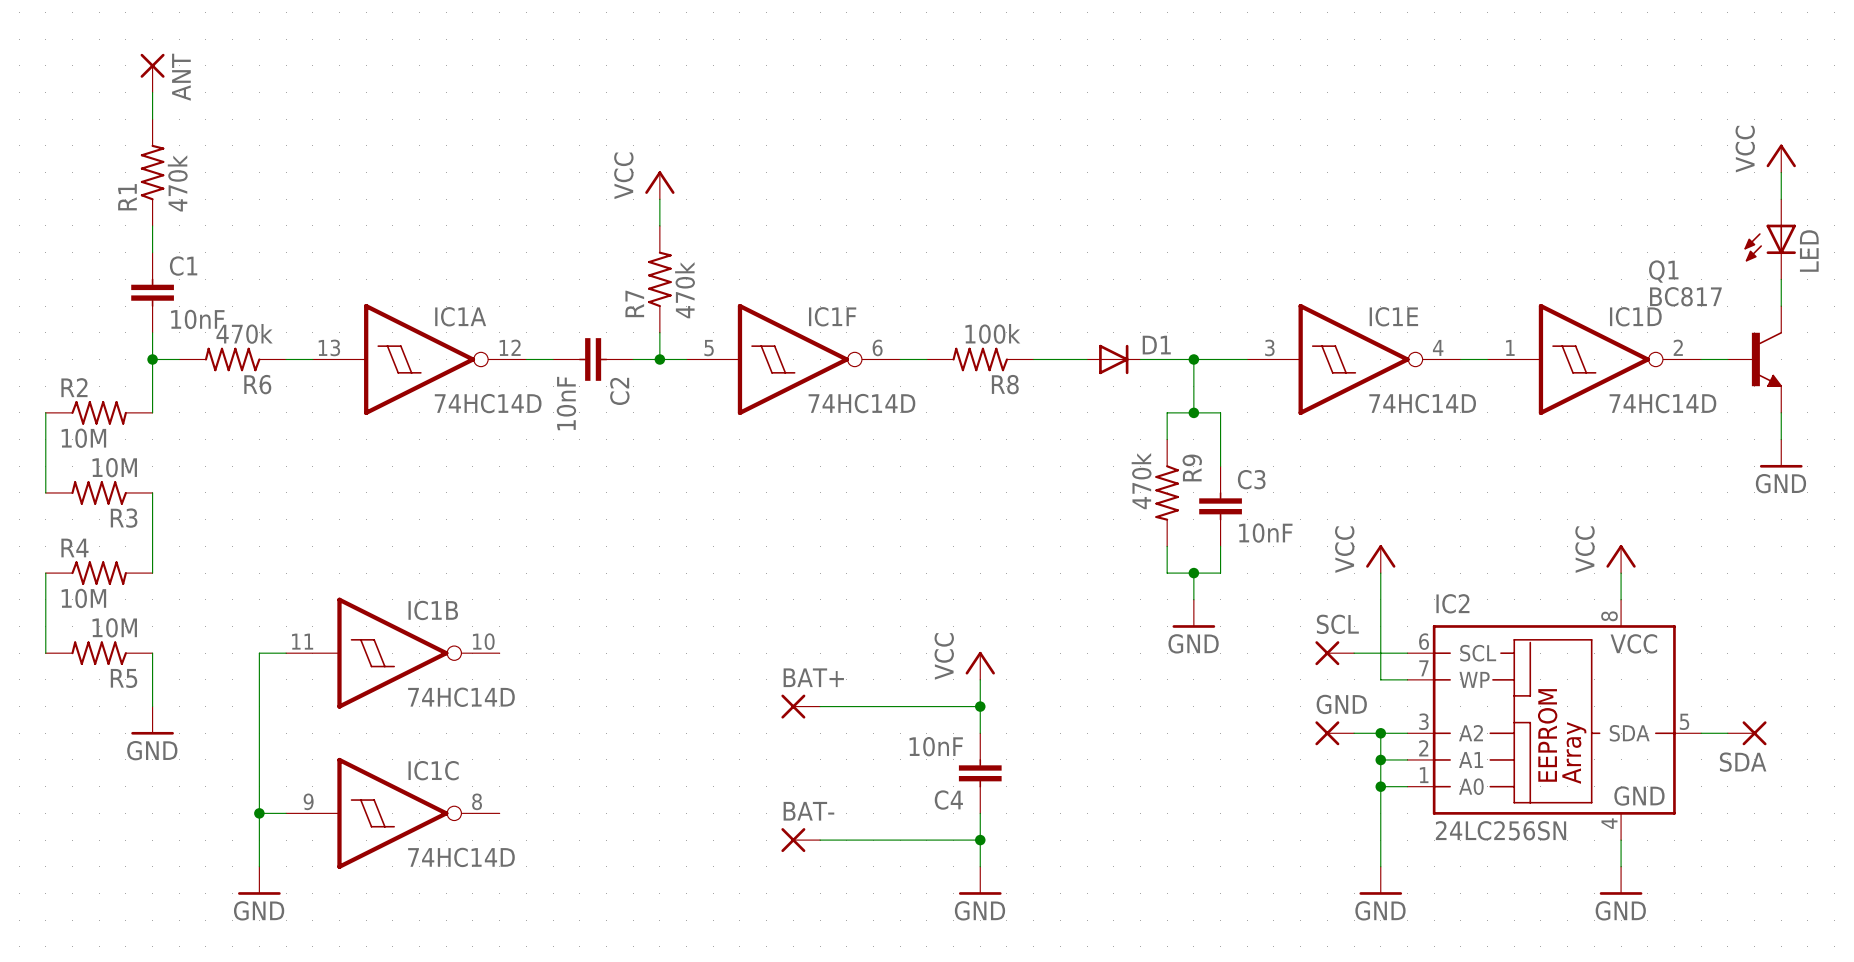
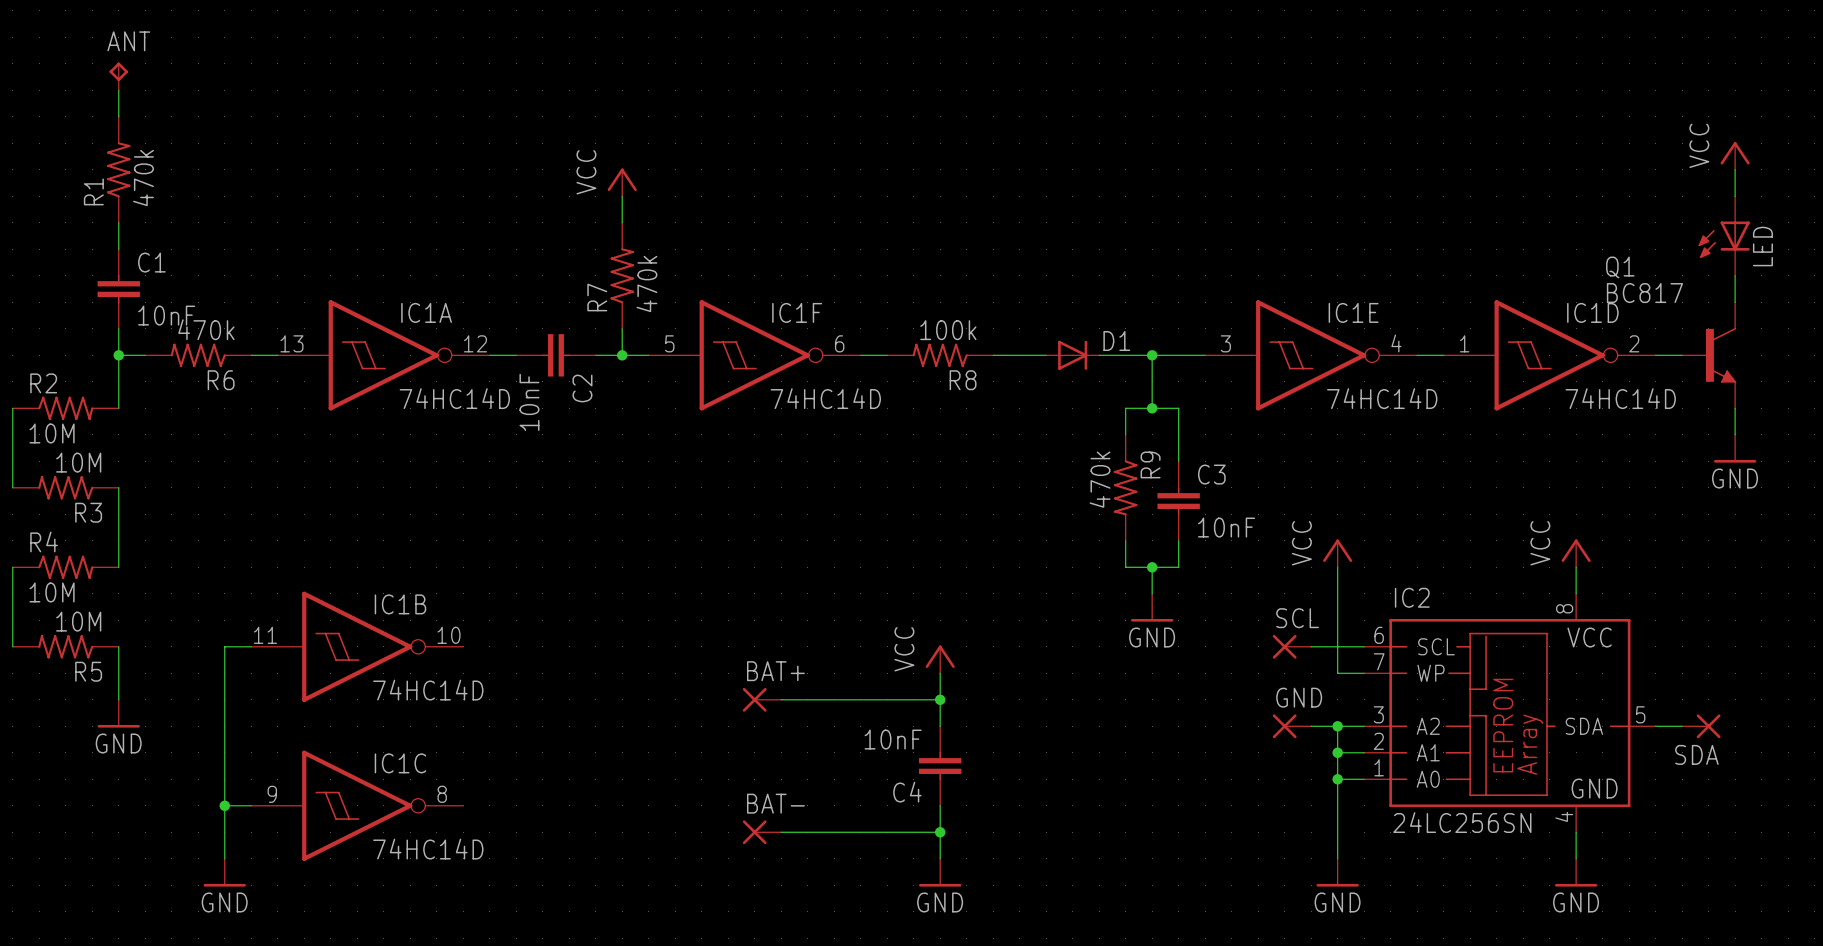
ANT symbol: [140, 53, 165, 93] -> [109, 62, 129, 91]
ANT name position: ANT (181, 77) -> ANT (128, 41)

